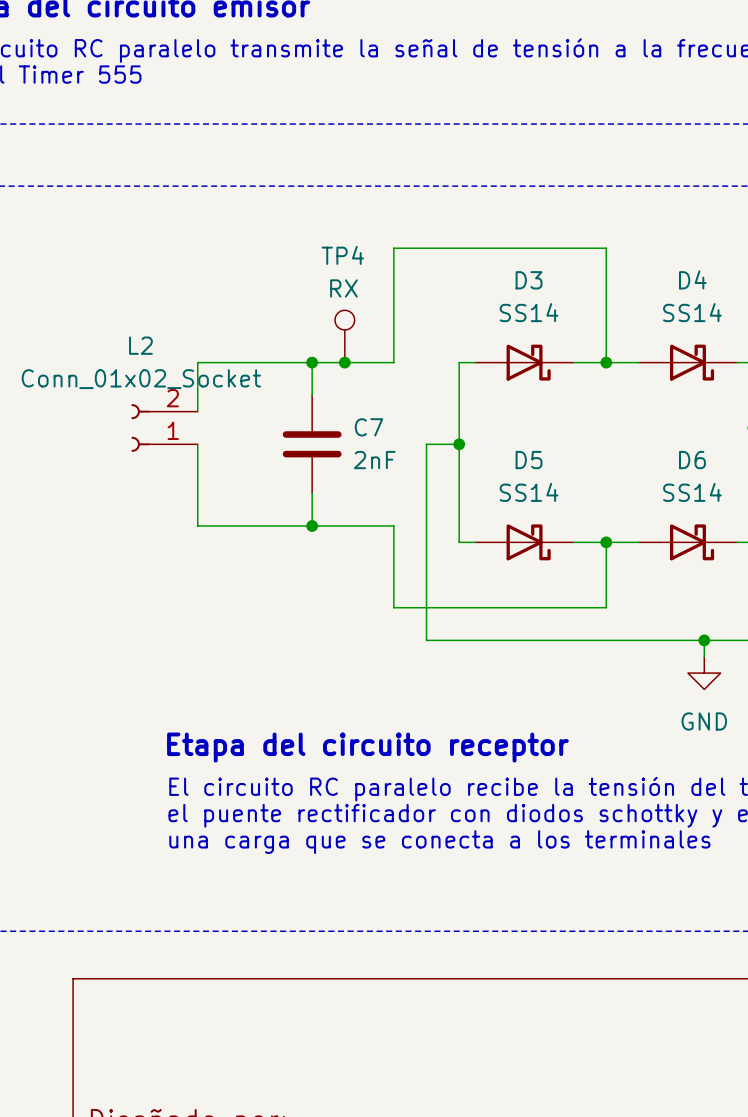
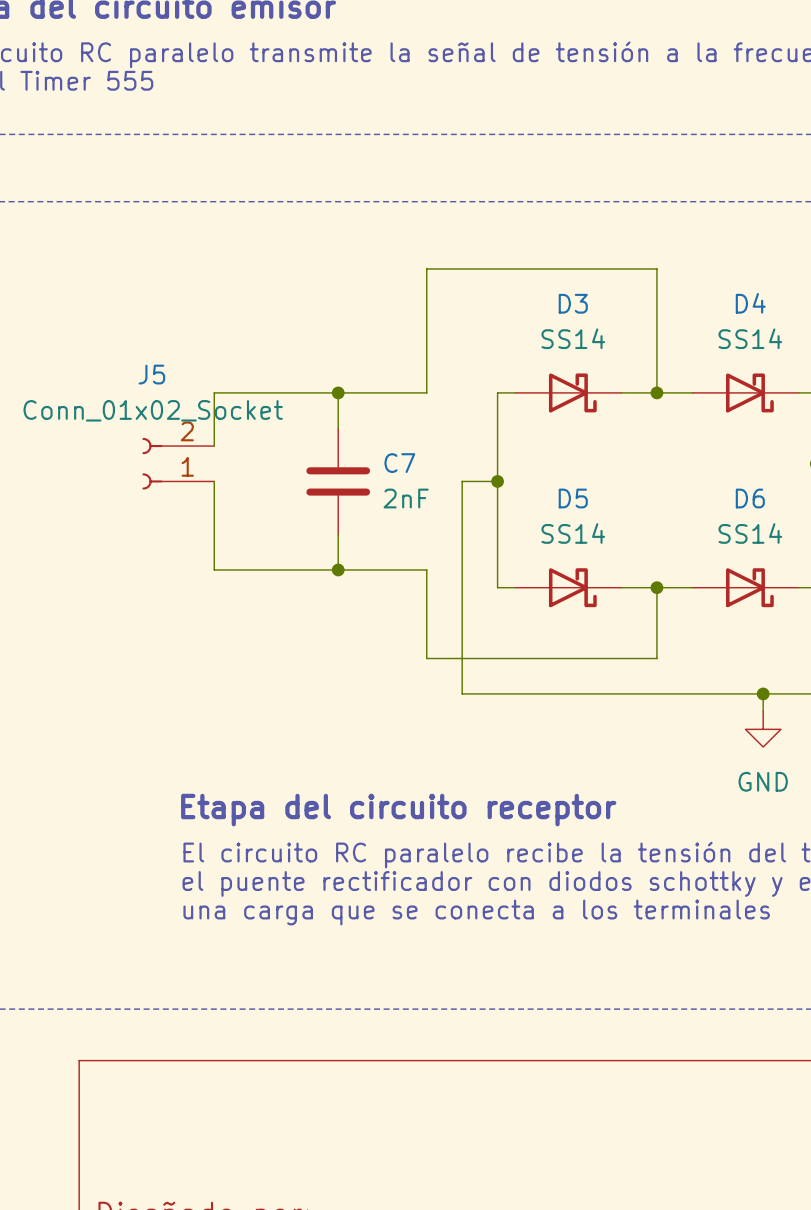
TP4: RX (344, 336) -> none
L2 name: L2 (140, 345) -> J5 (151, 374)
junction: (344, 362) -> none

